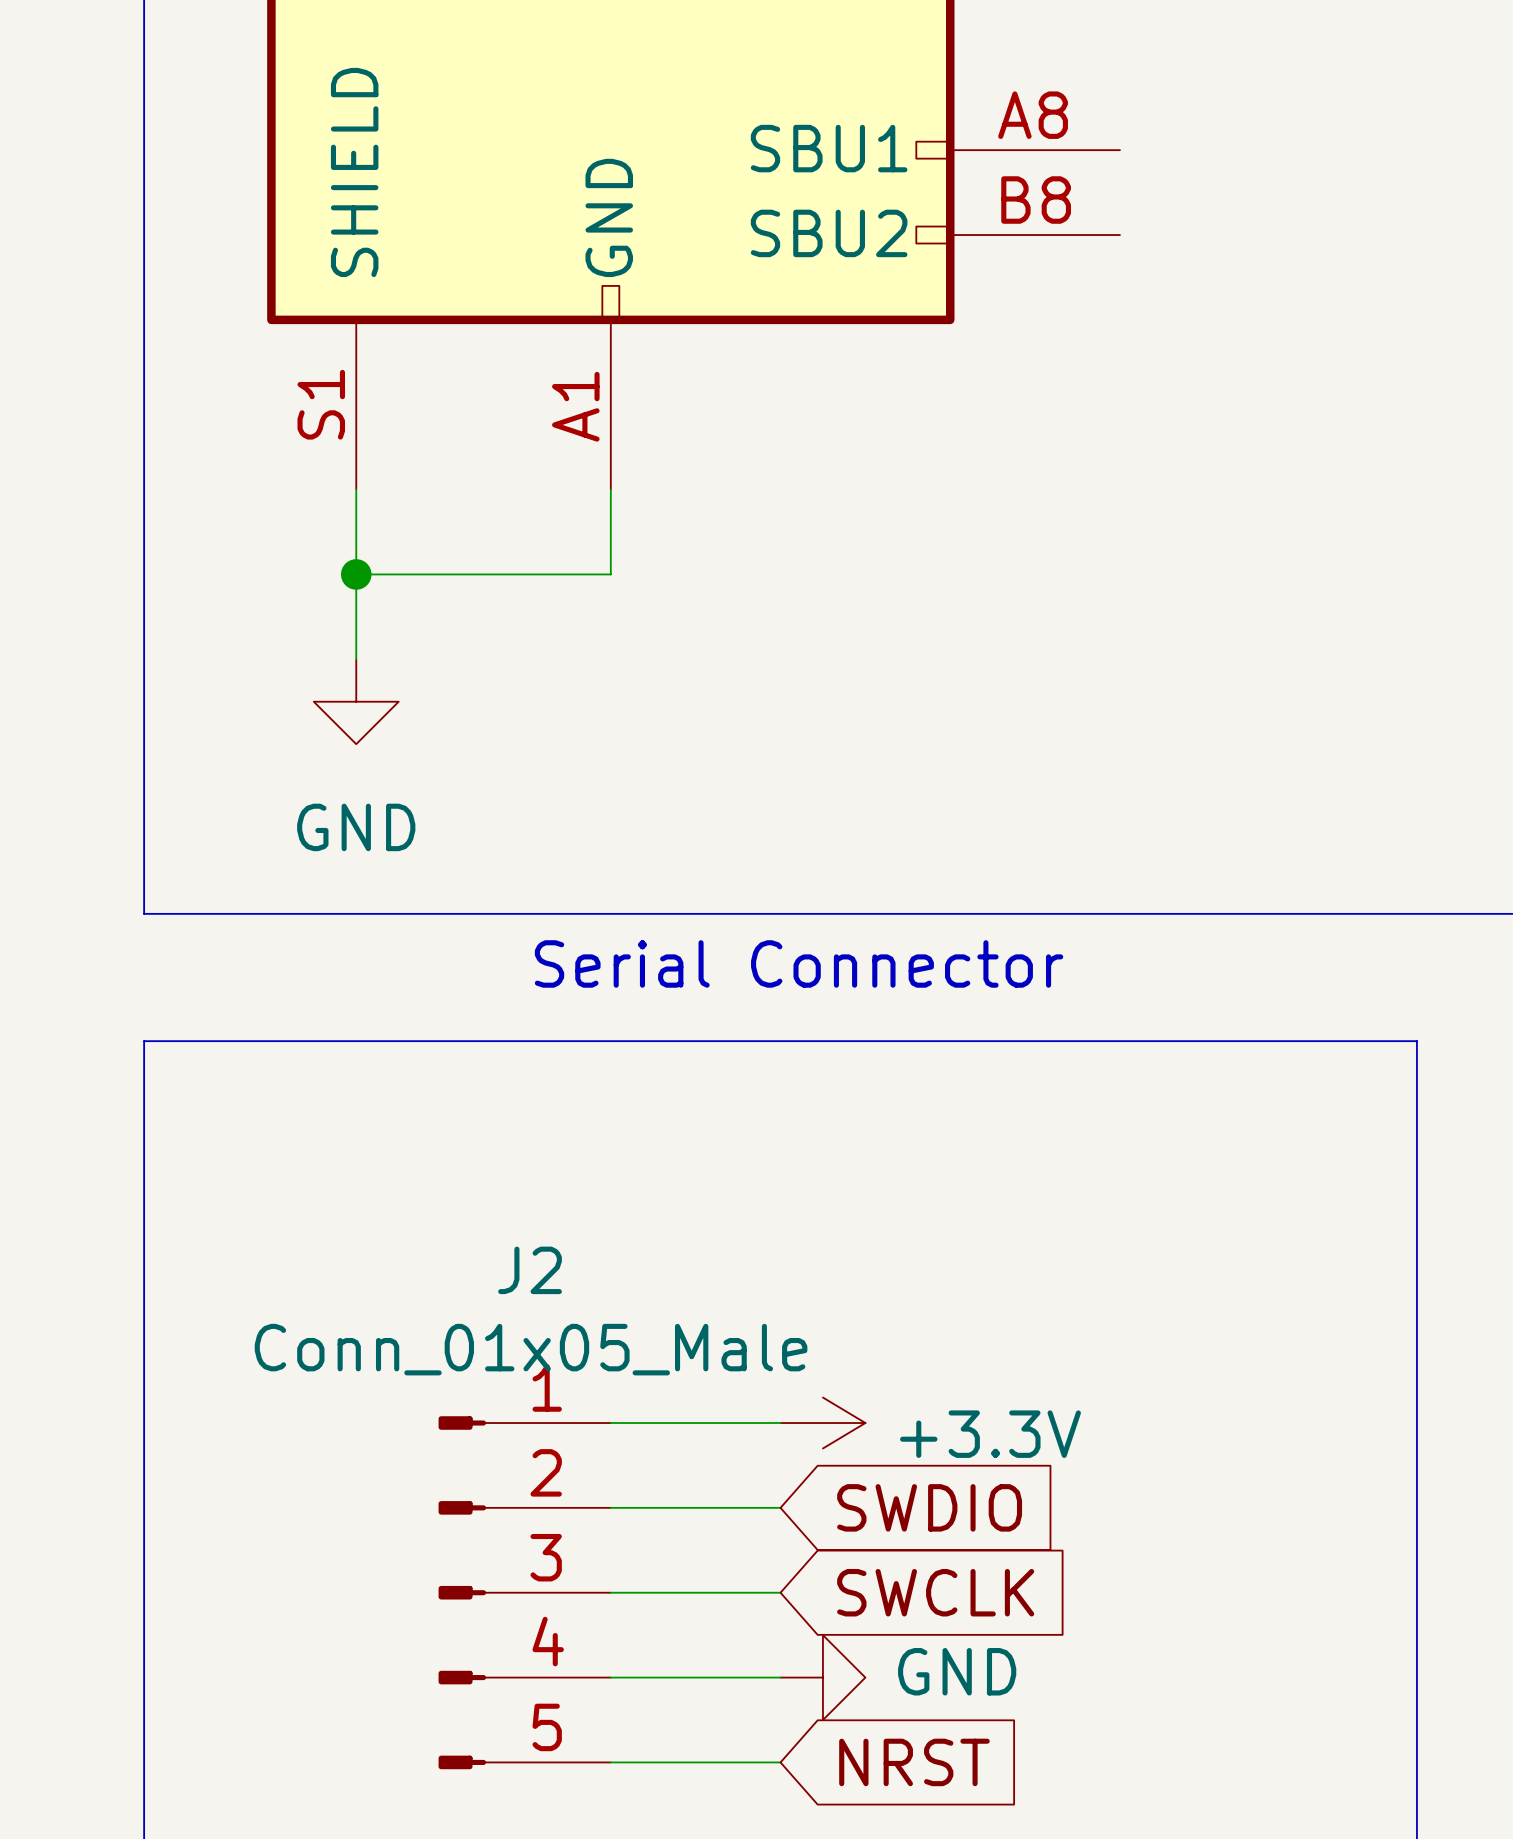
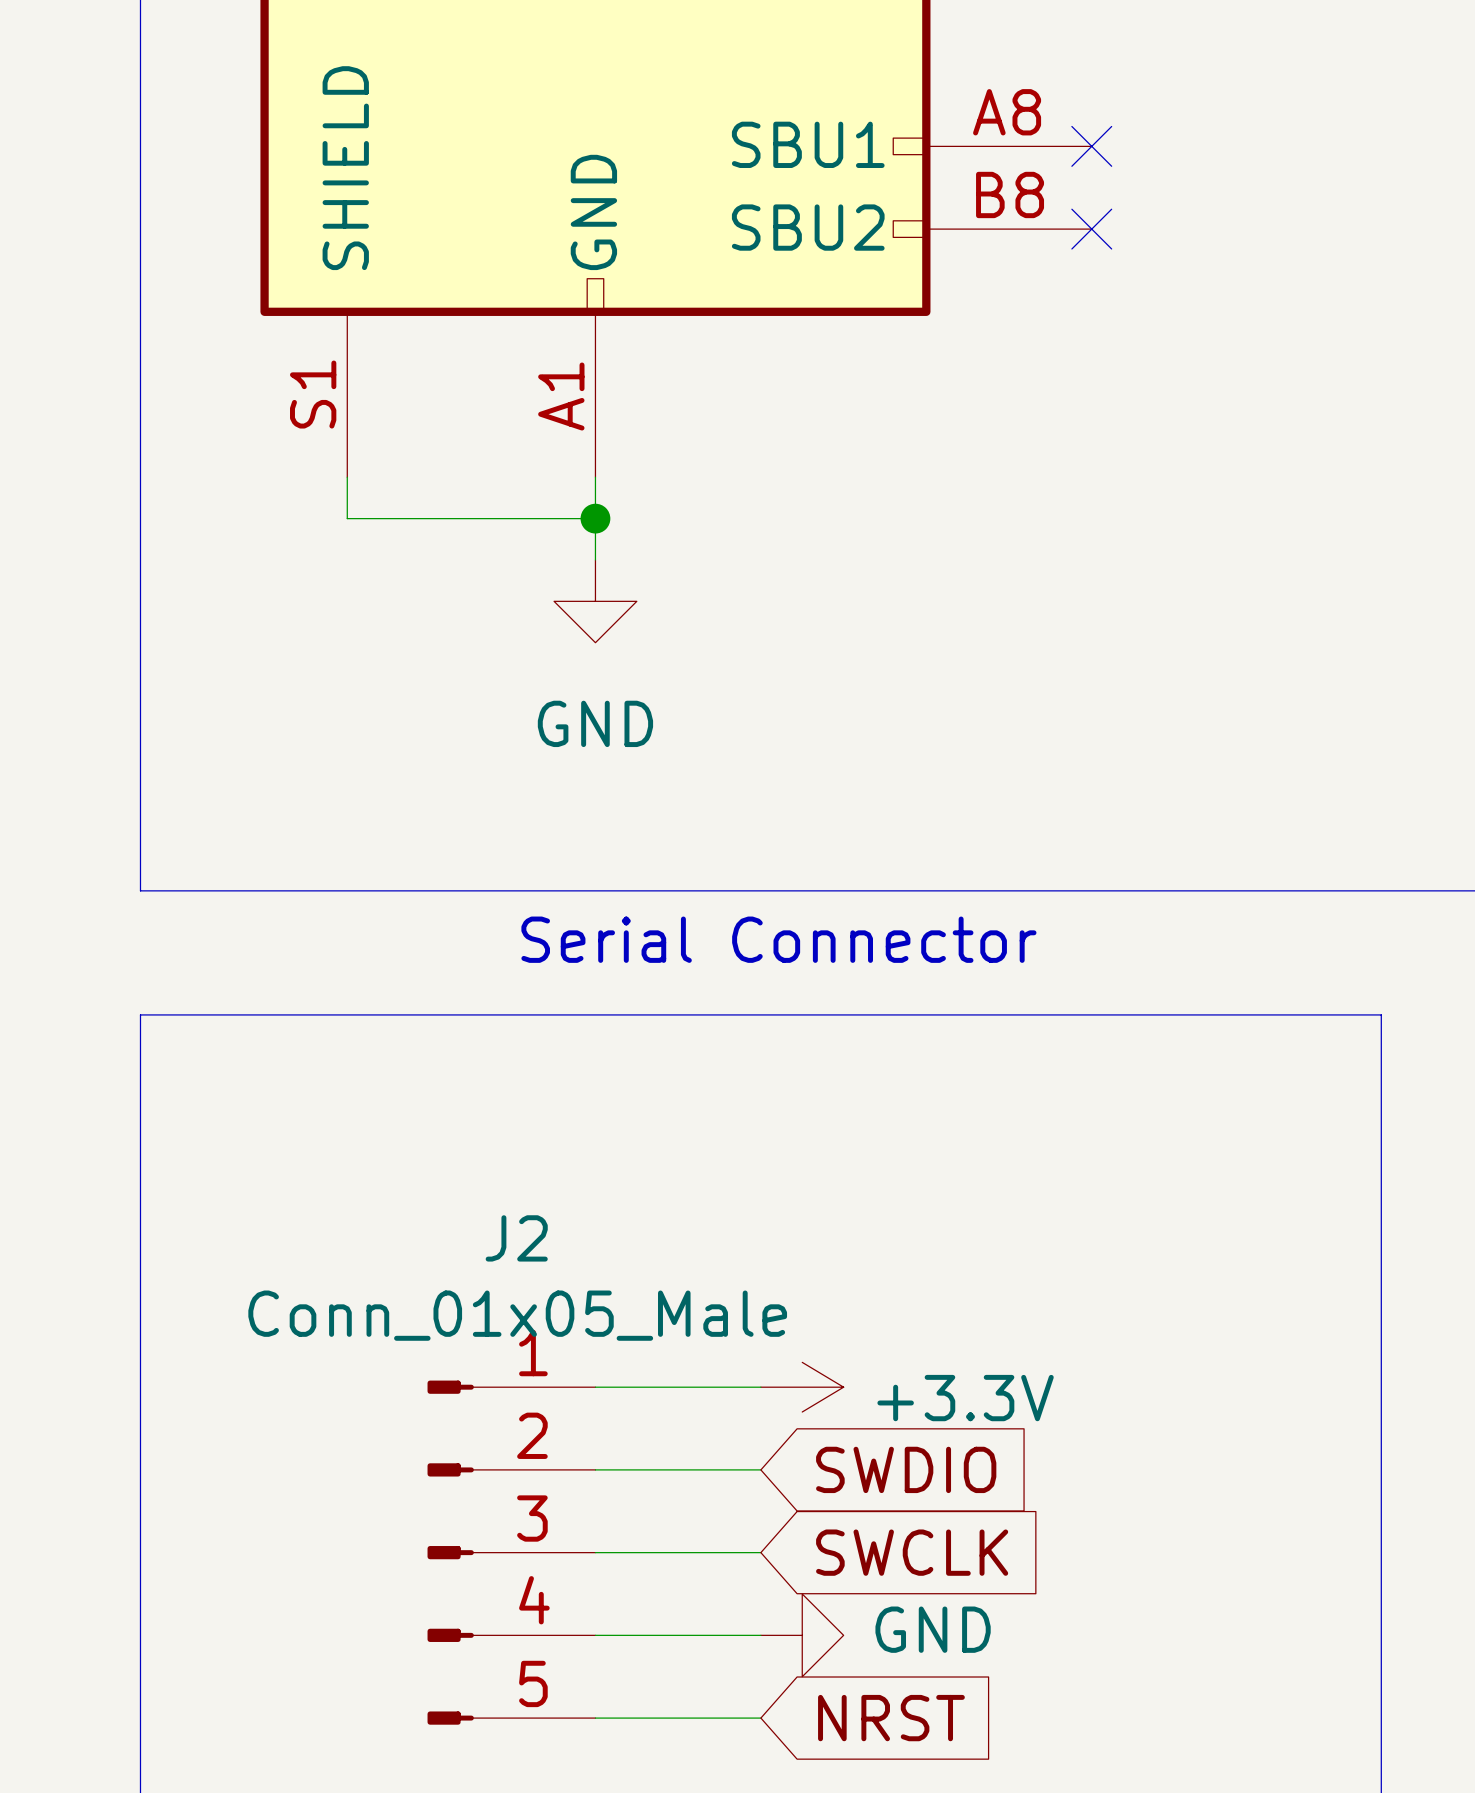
no-connect mark: none -> (1091, 146)
no-connect mark: none -> (1091, 229)
wire: (356, 532) (356, 659) -> (347, 518) (595, 518)
junction: none -> (595, 518)
wire: (356, 574) (610, 574) -> none
junction: (356, 574) -> none
power symbol position: GND (356, 701) -> GND (595, 601)

